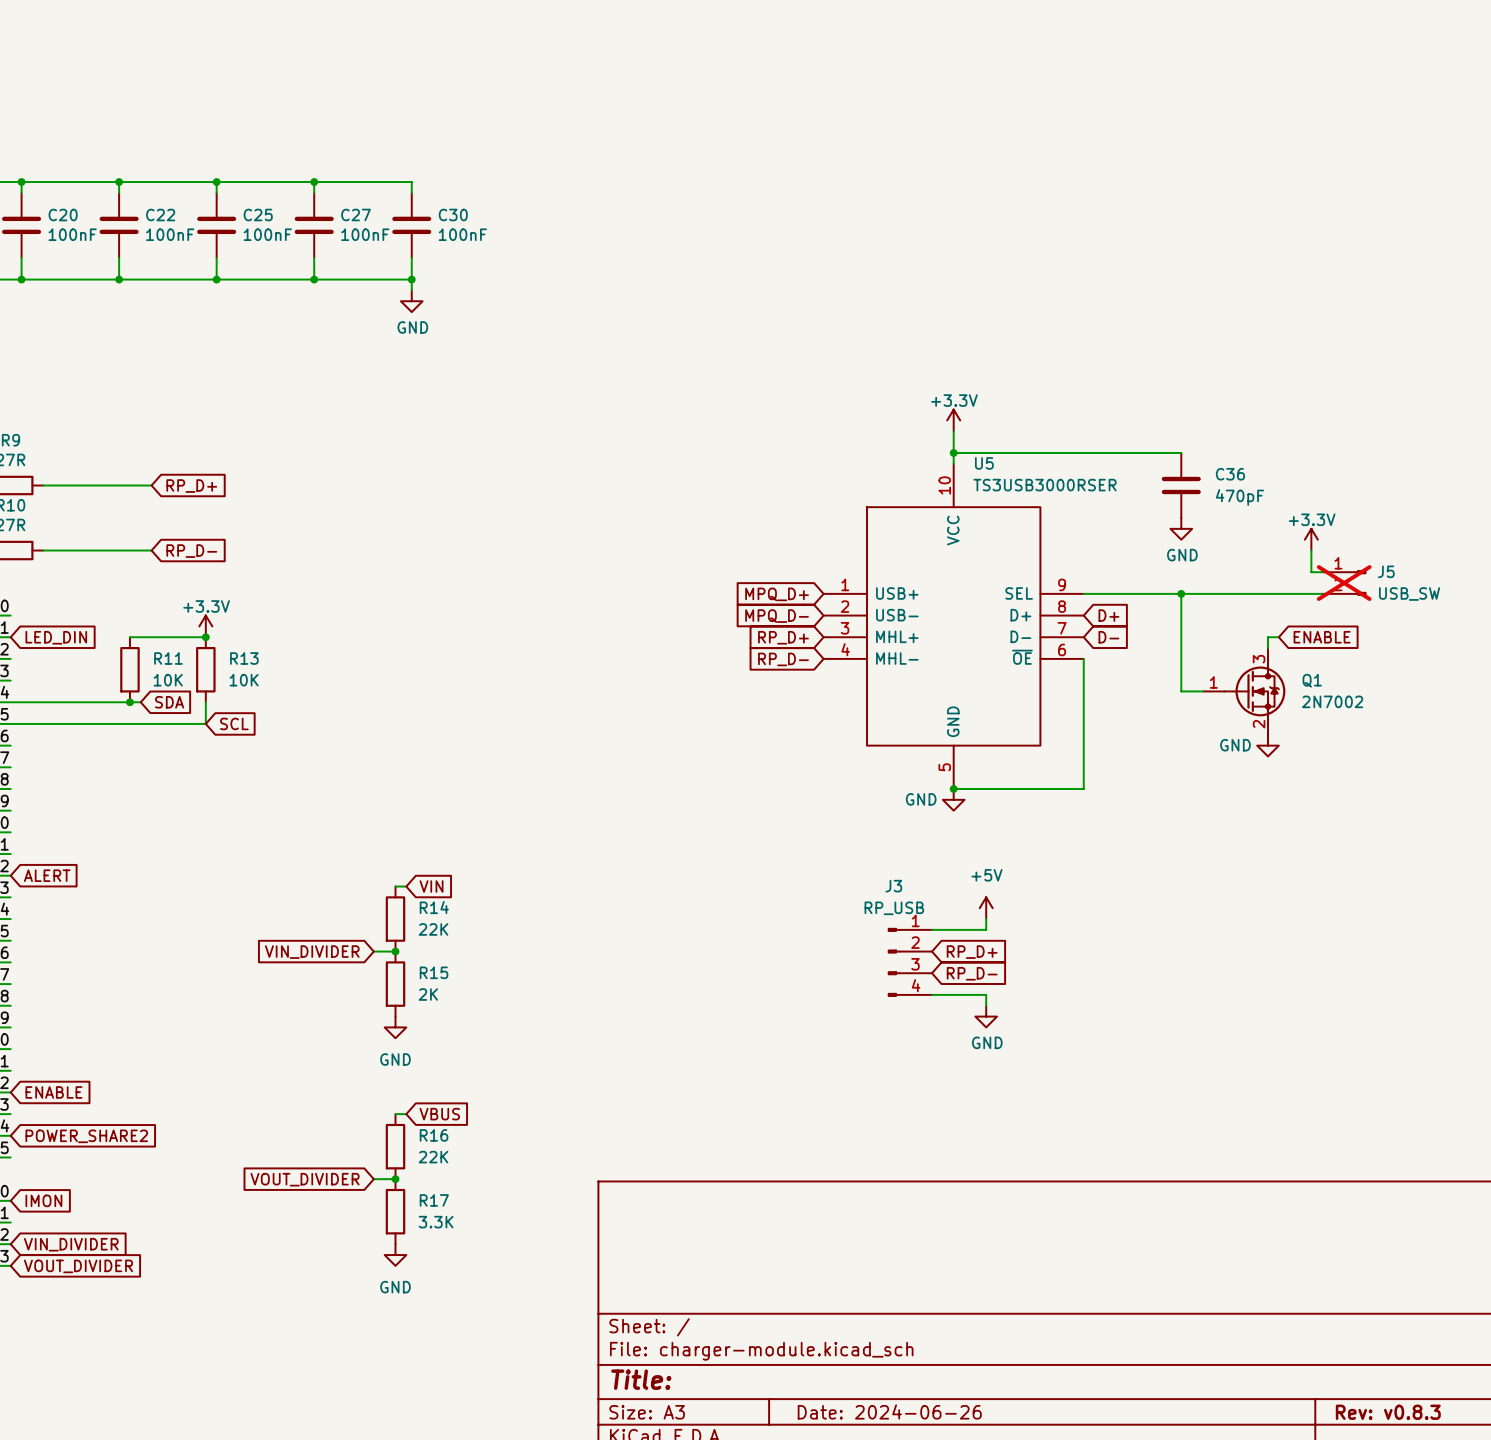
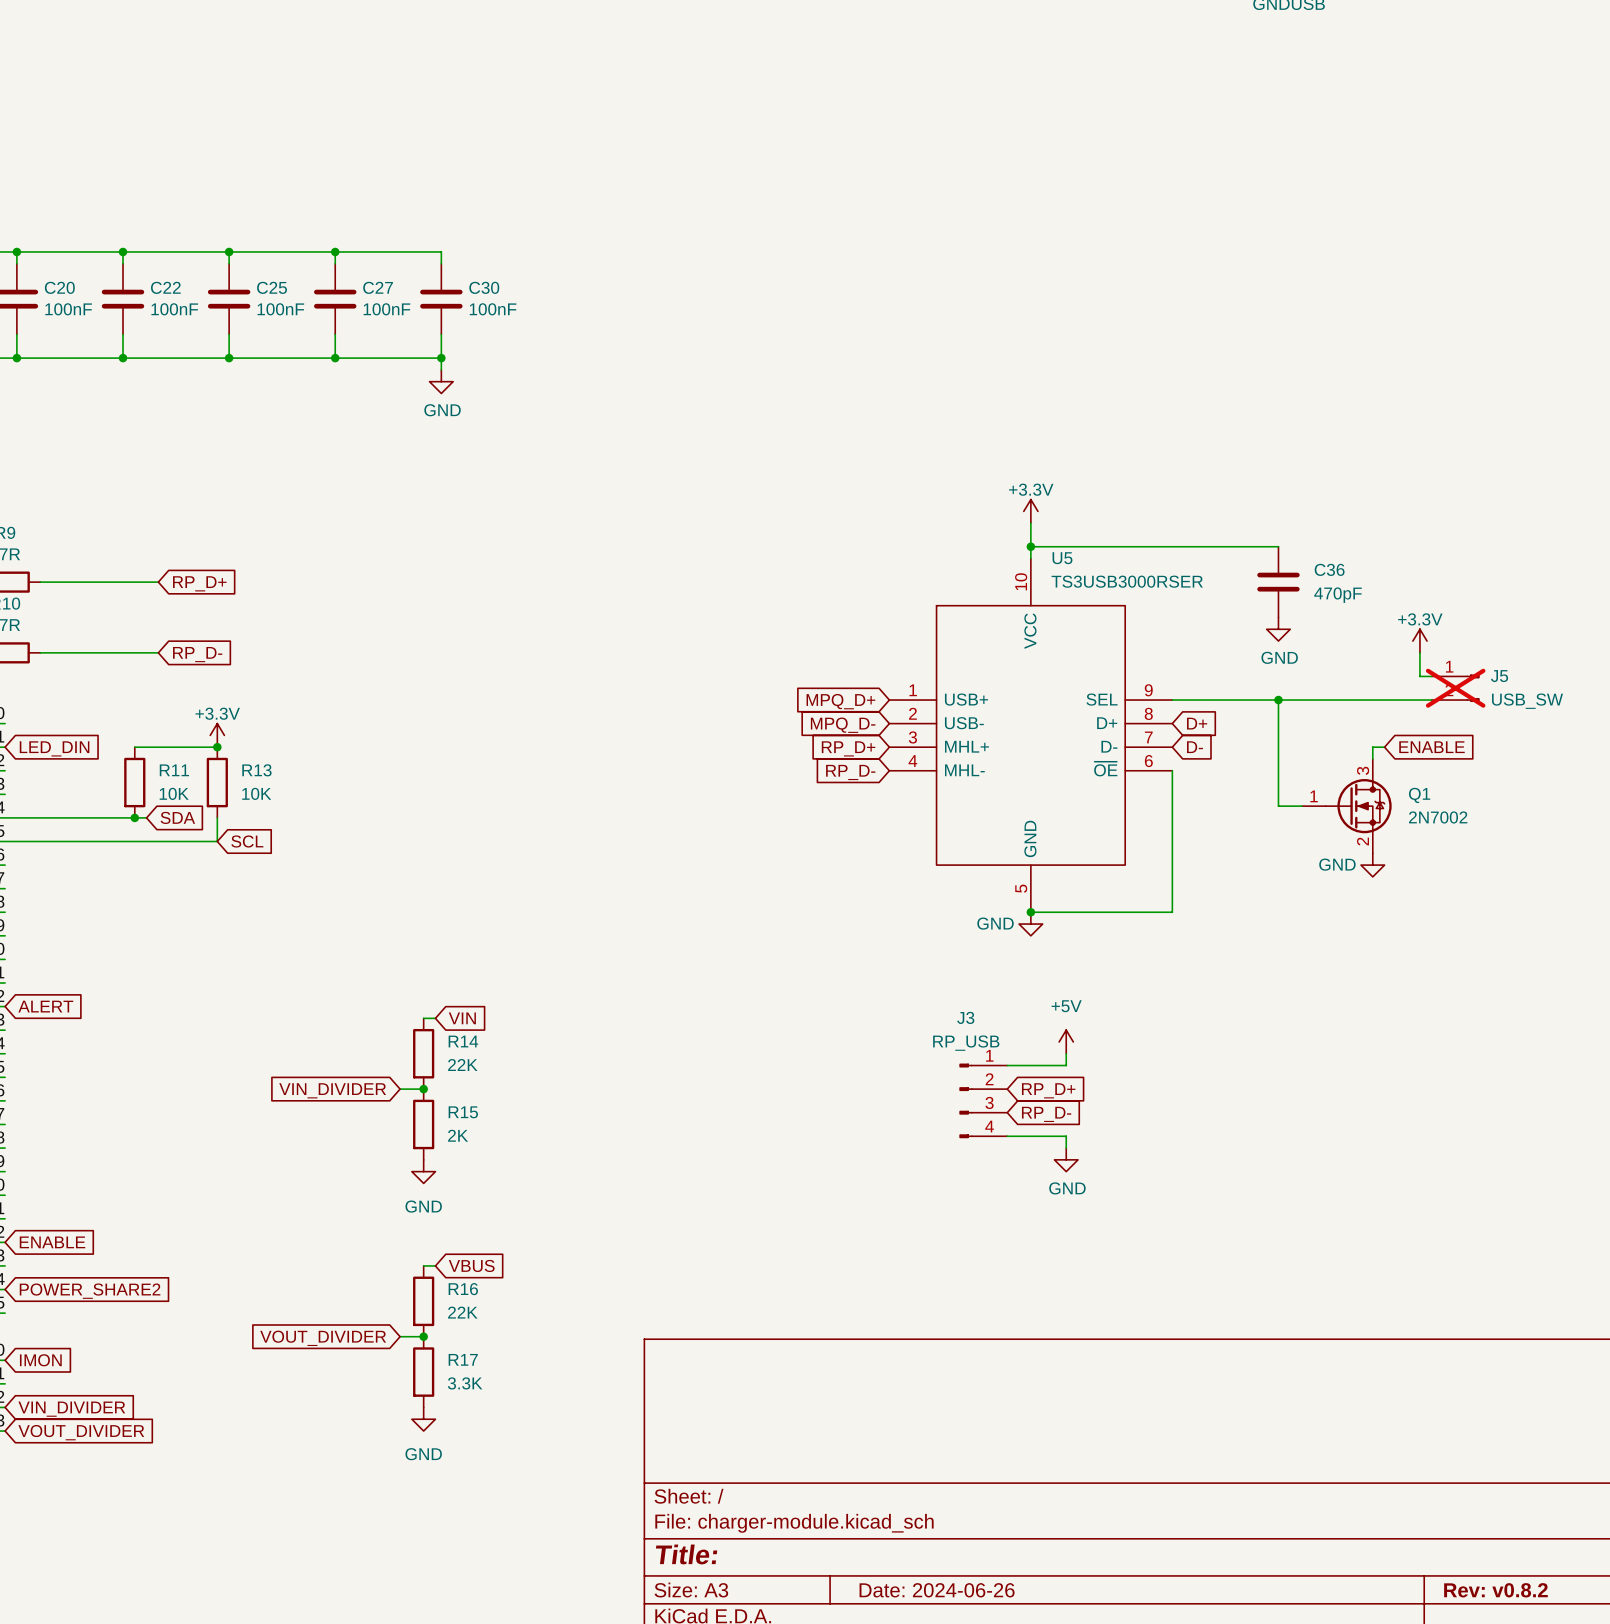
title block: Rev: v0.8.3 (1388, 1412) -> Rev: v0.8.2 (1495, 1590)

